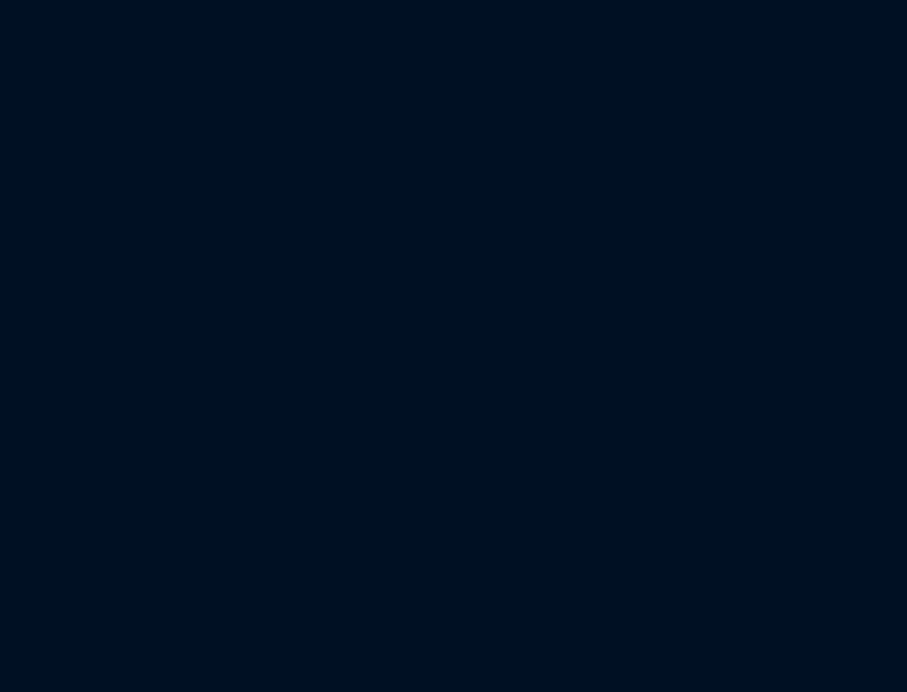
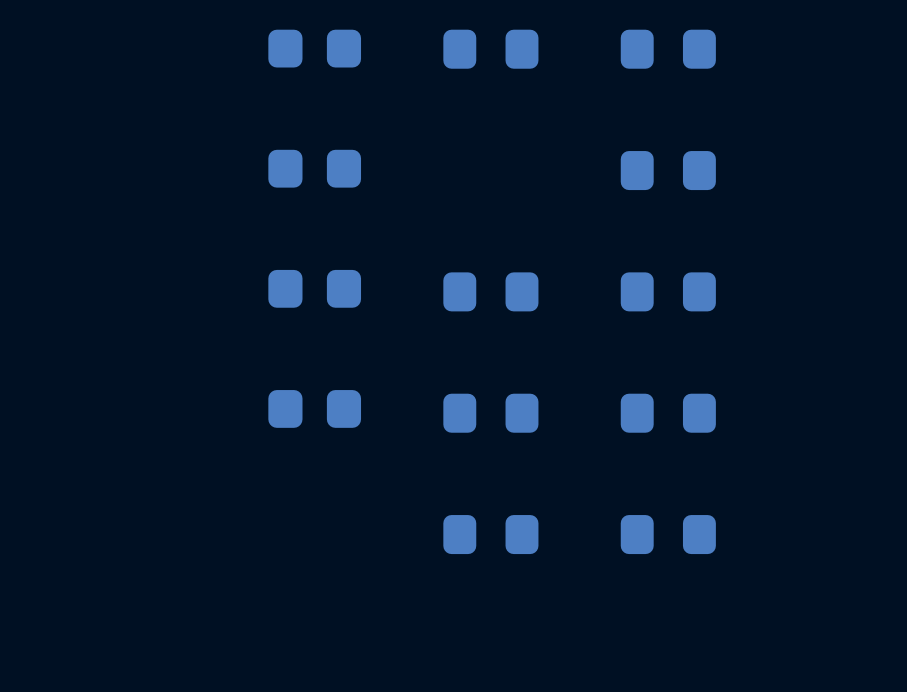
part: none -> (314, 48)
part: none -> (490, 49)
part: none -> (668, 49)
part: none -> (314, 168)
part: none -> (668, 170)
part: none -> (314, 288)
part: none -> (490, 291)
part: none -> (668, 291)
part: none -> (314, 408)
part: none -> (490, 413)
part: none -> (668, 413)
part: none -> (490, 534)
part: none -> (668, 534)

